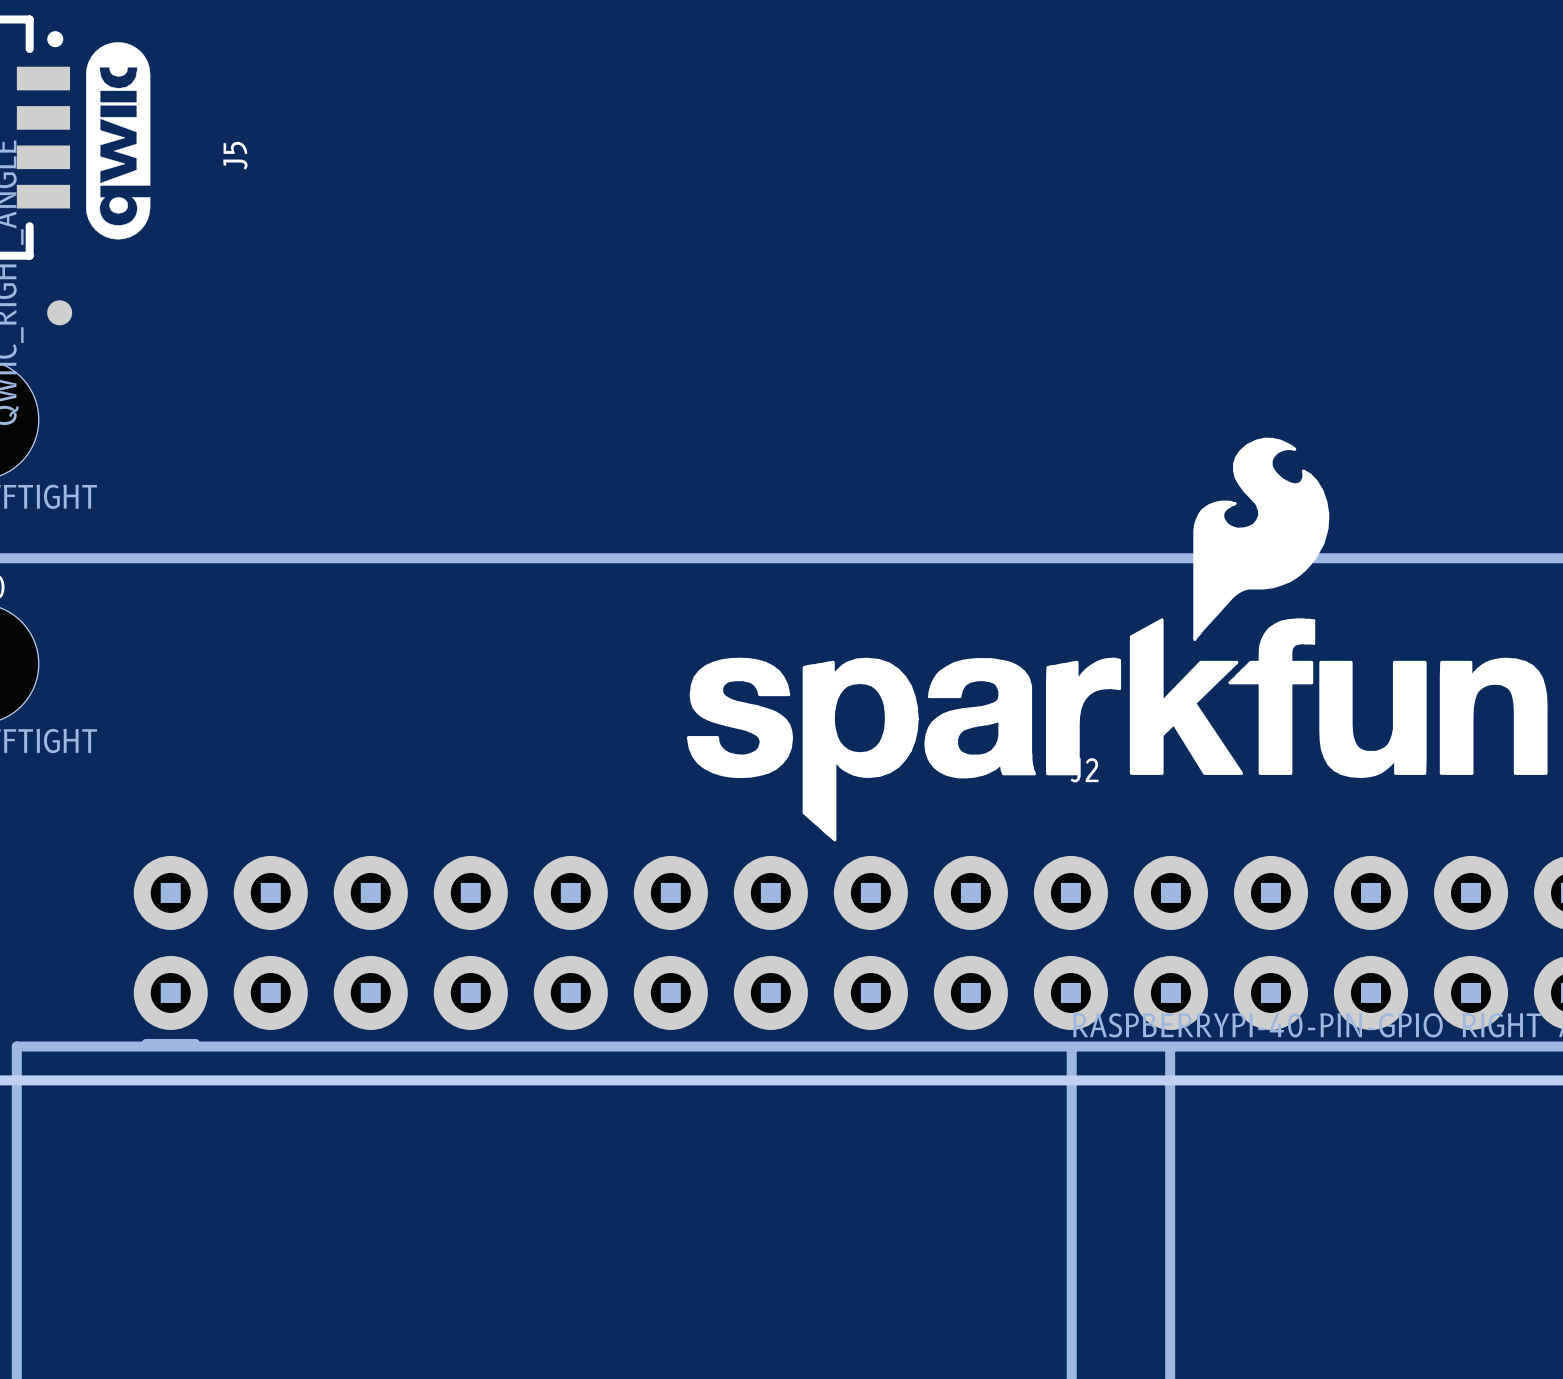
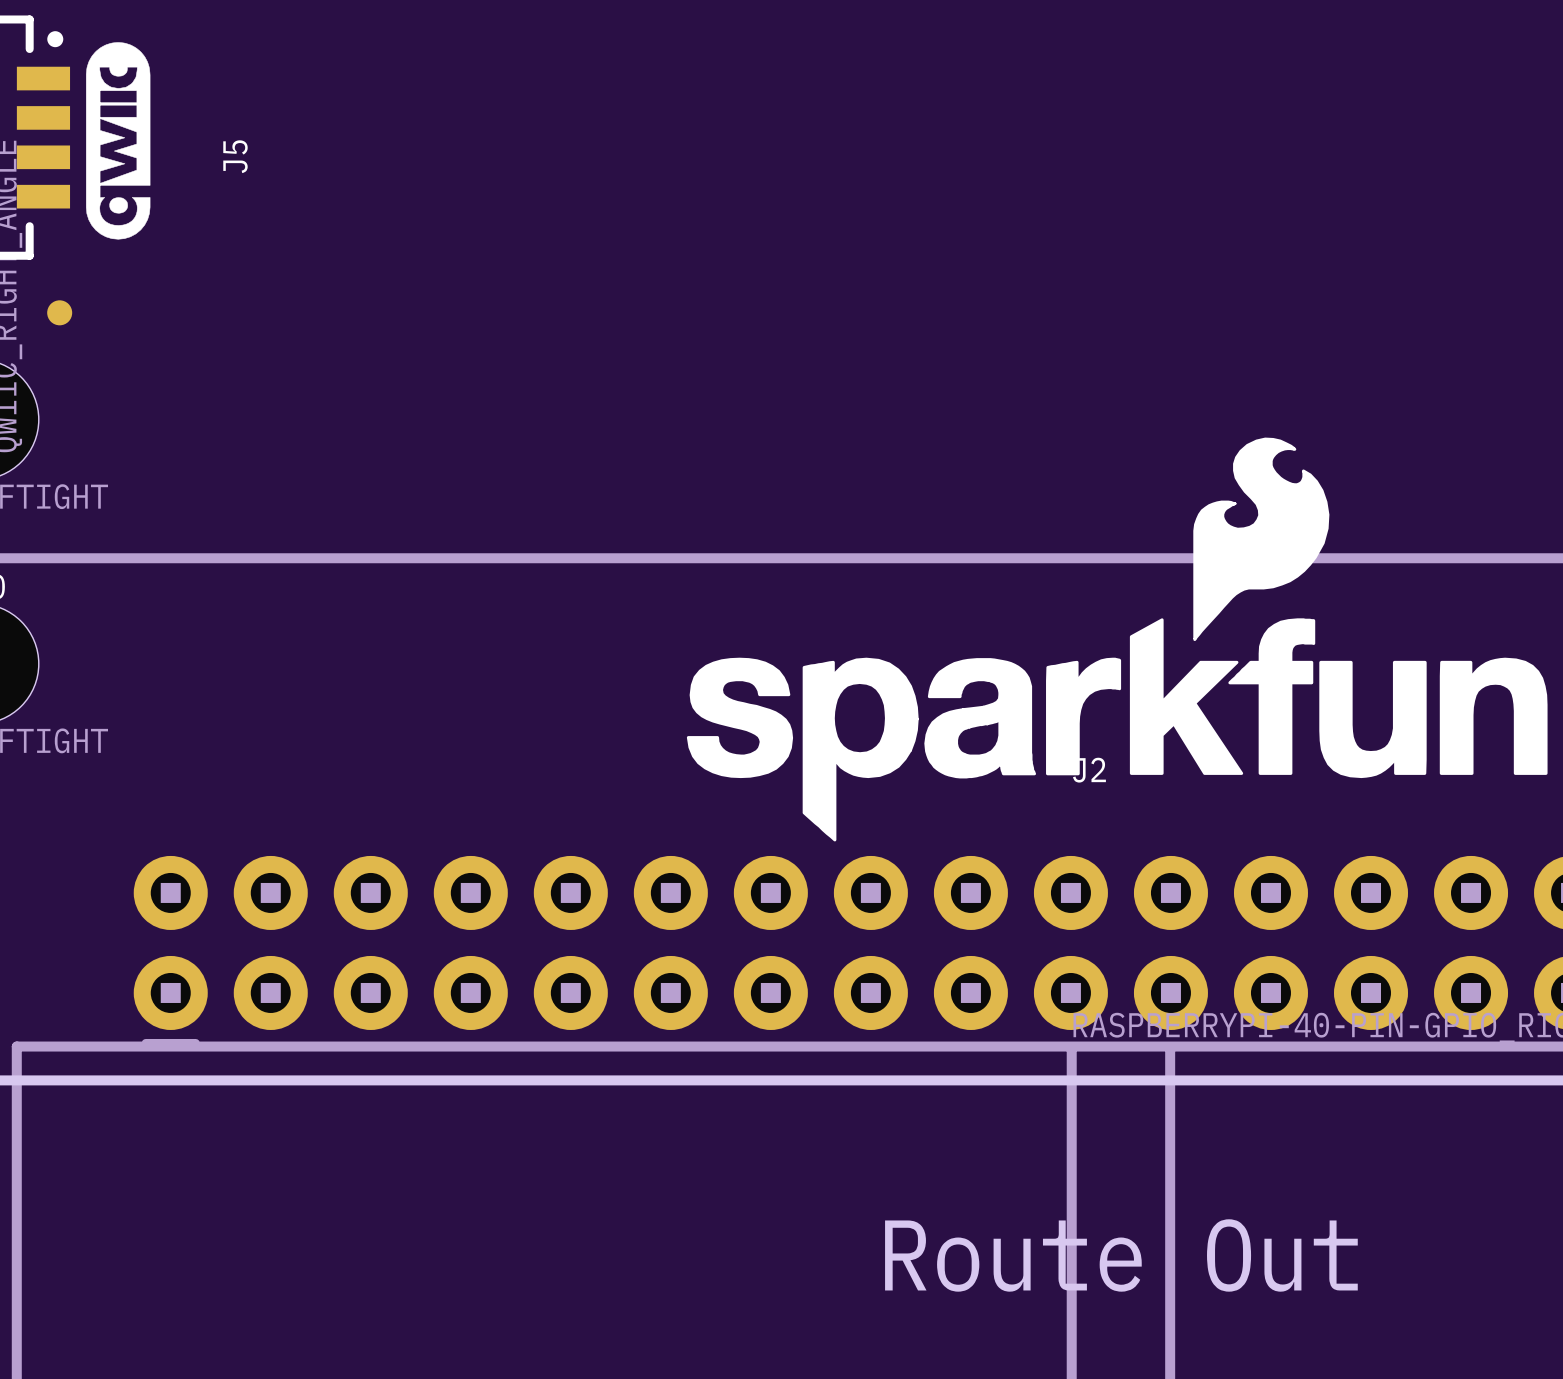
text: none -> Route Out (1121, 1255)

